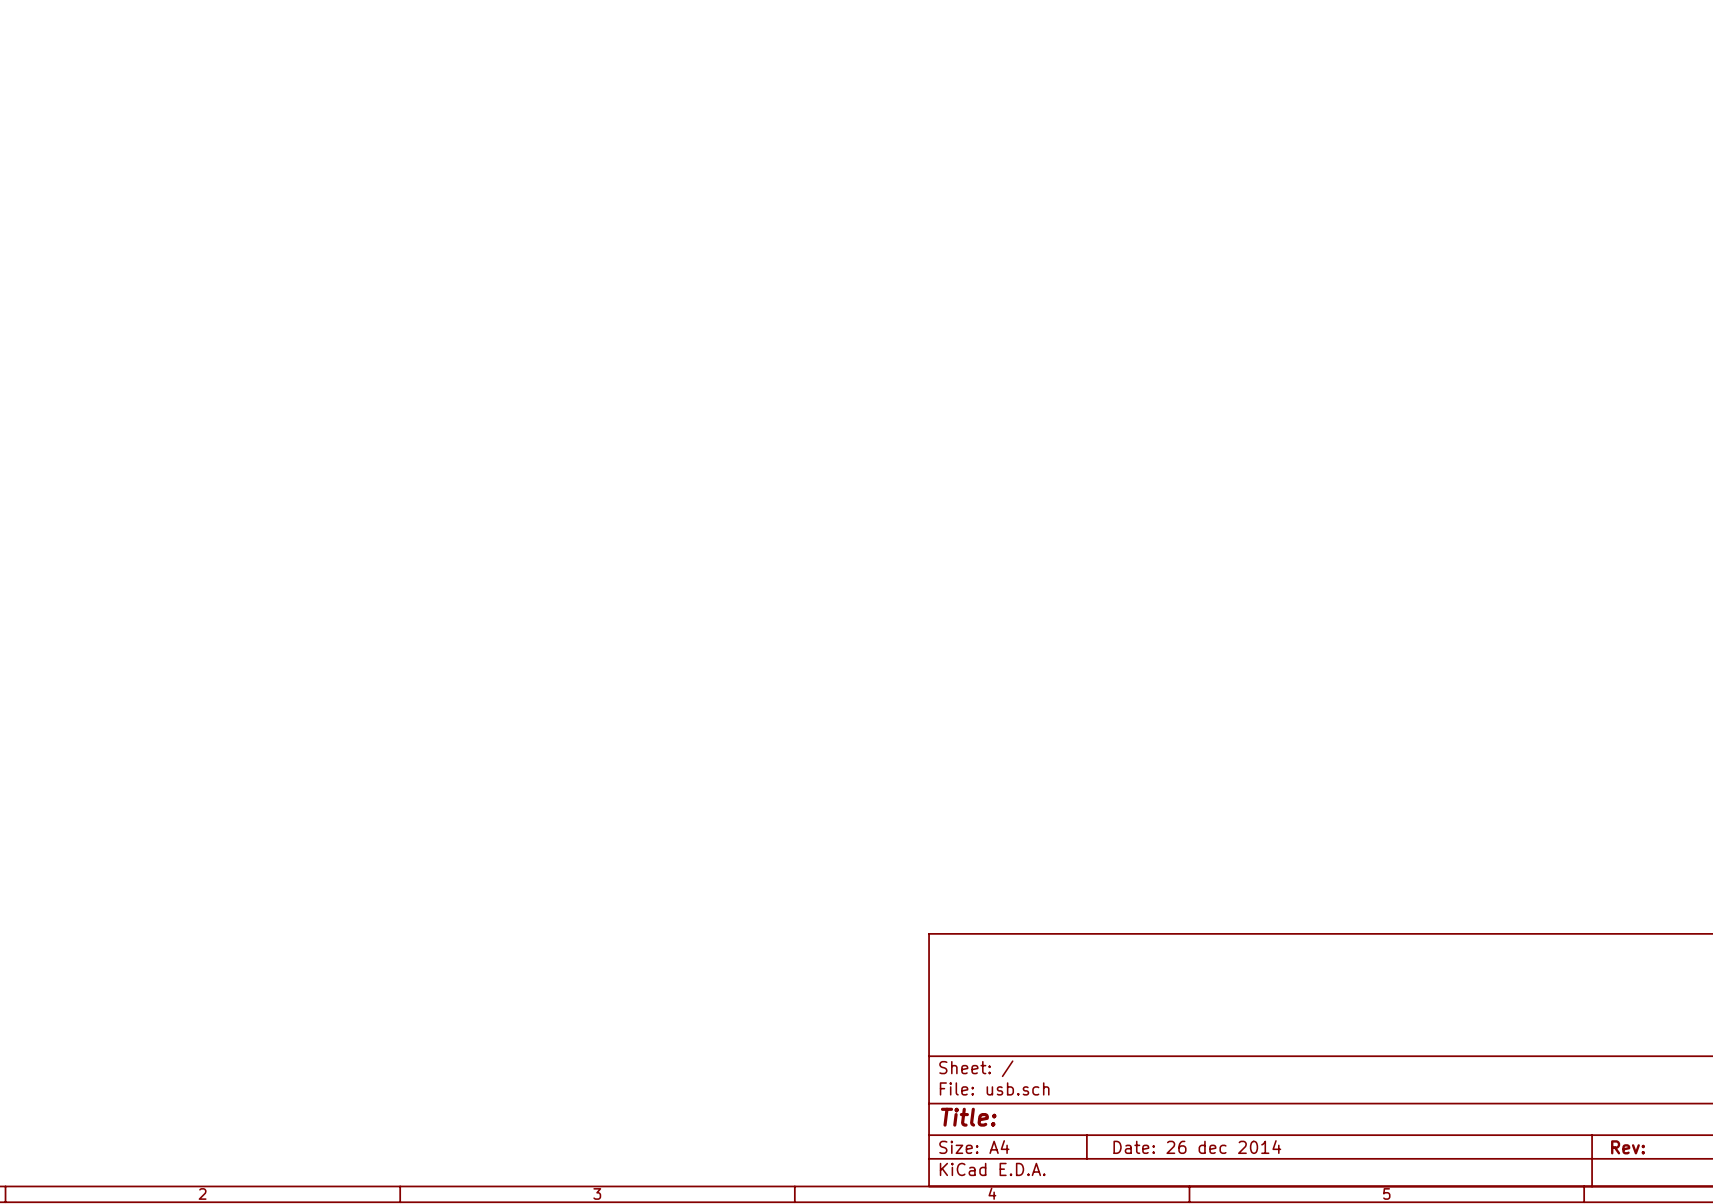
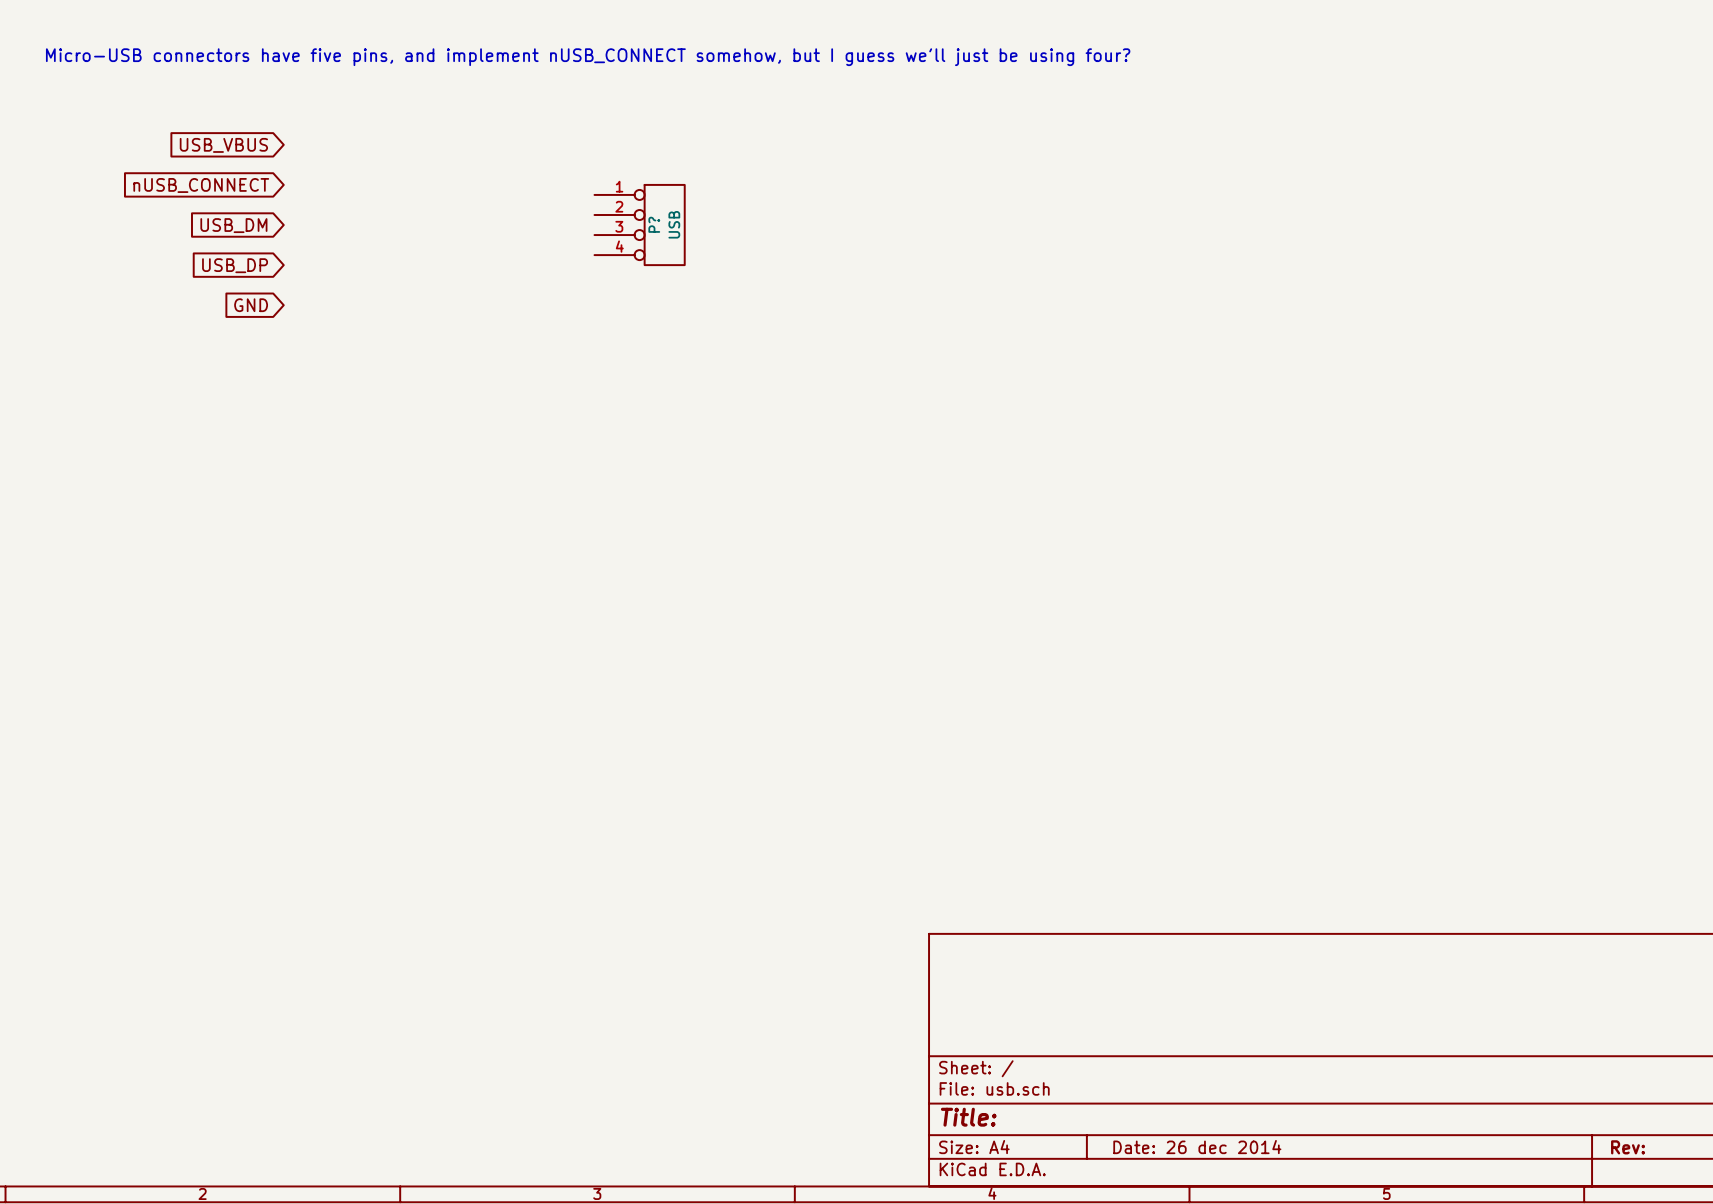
text: none -> Micro-USB connectors have five pins, and implement nUSB_CONNECT somehow, but I guess we'll just be using four? (588, 57)
global label: none -> USB_VBUS (223, 145)
global label: none -> nUSB_CONNECT (201, 185)
global label: none -> USB_DM (233, 225)
P?: none -> USB (639, 225)
global label: none -> USB_DP (235, 265)
global label: none -> GND (251, 305)

